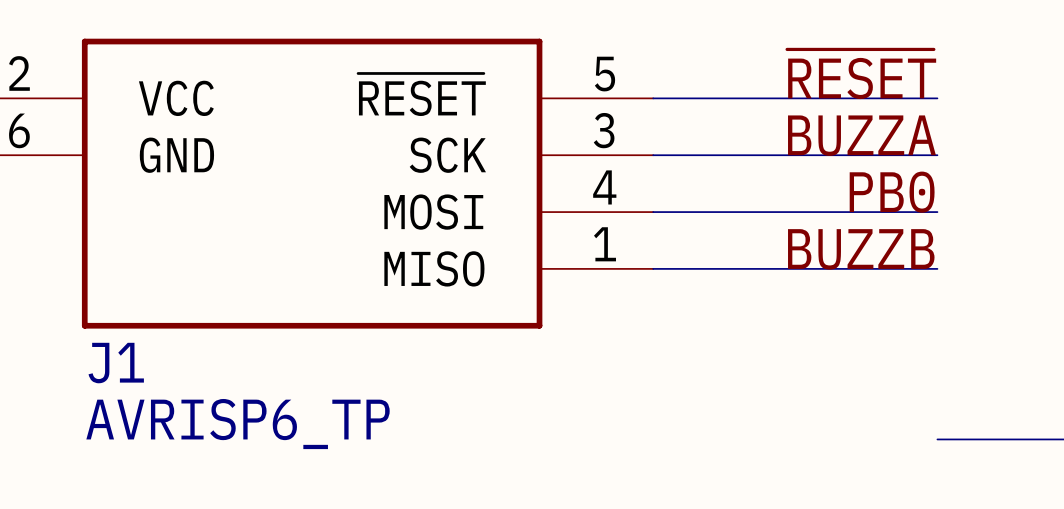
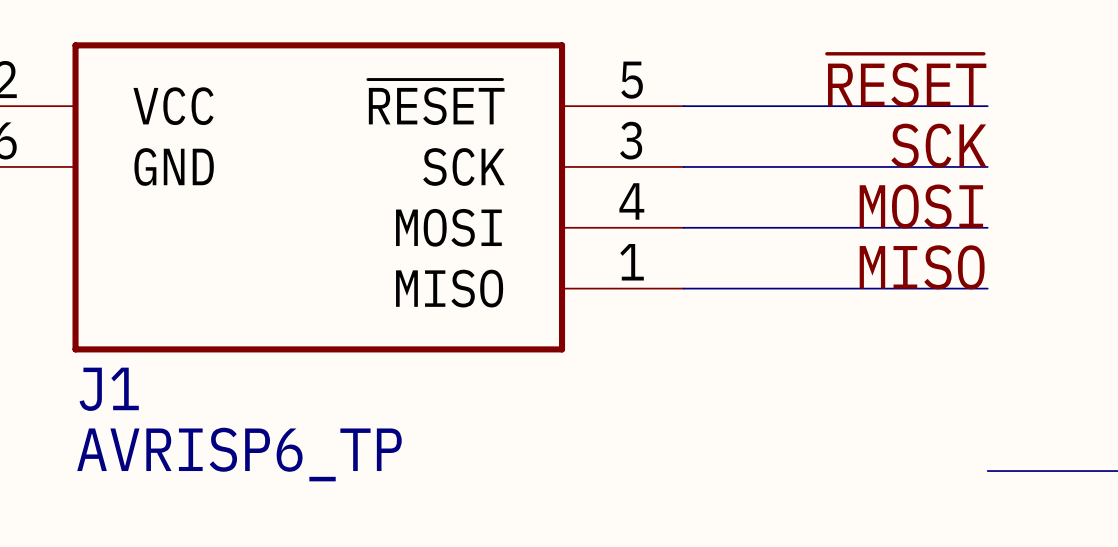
label: BUZZA (861, 135) -> SCK (938, 145)
label: PB0 (892, 192) -> MOSI (921, 206)
label: BUZZB (861, 249) -> MISO (922, 267)

